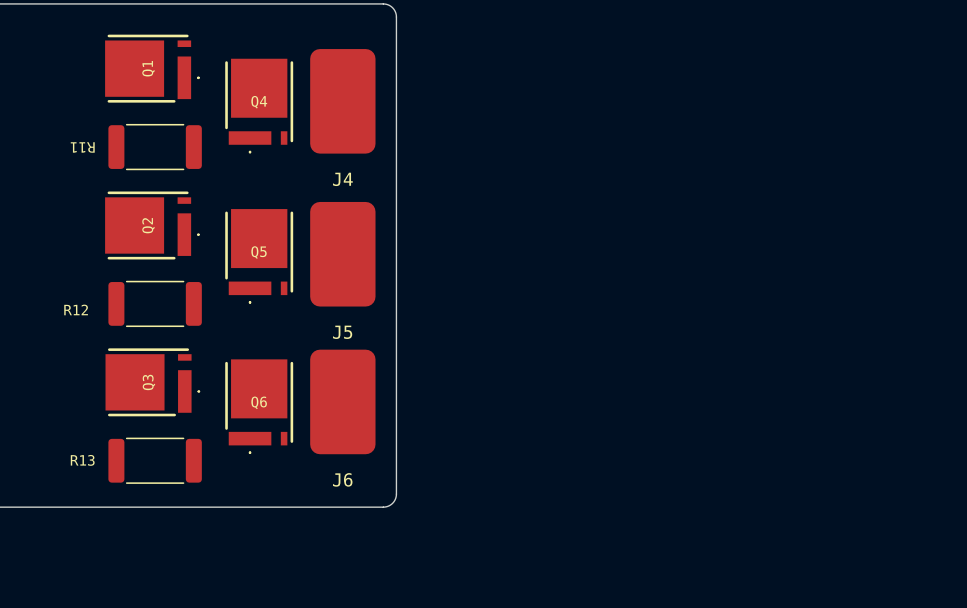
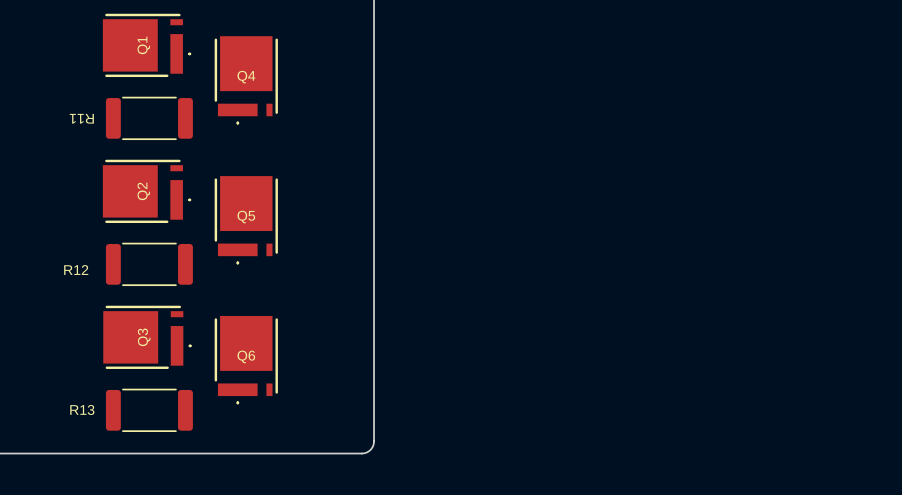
J4: (342, 101) -> none
J5: (342, 254) -> none
J6: (342, 401) -> none

